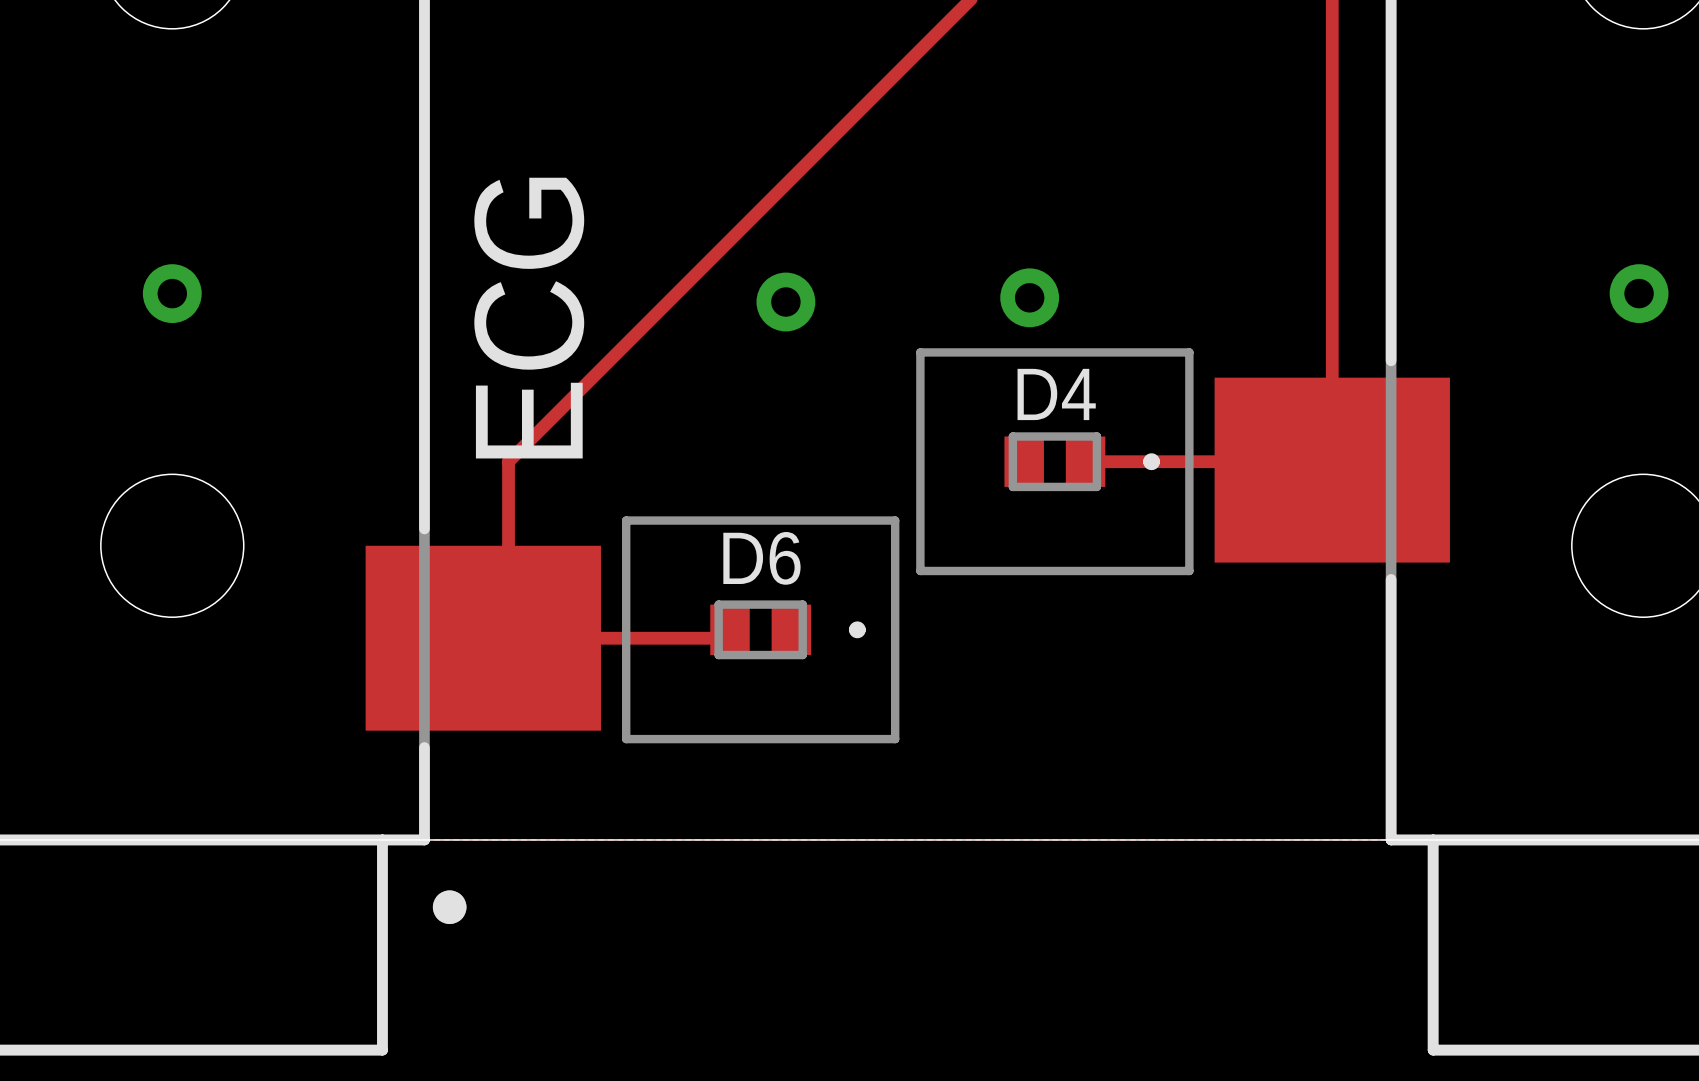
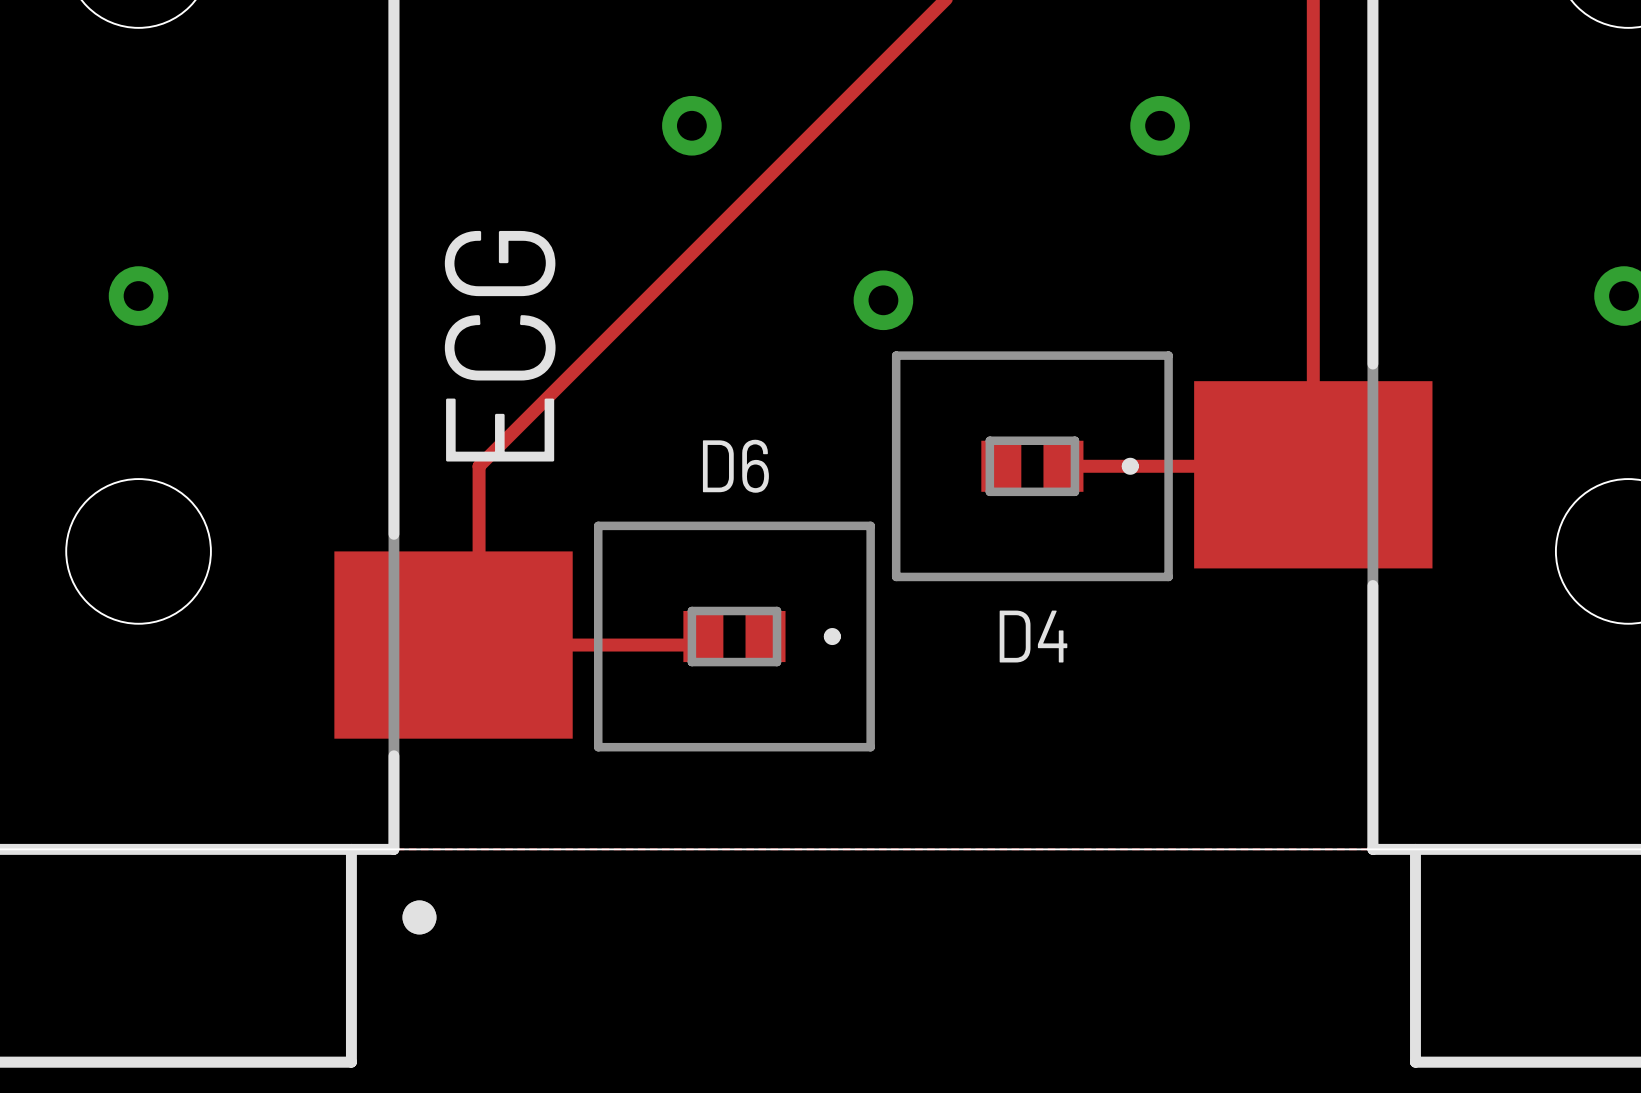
via: none -> (691, 125)
via: none -> (1160, 125)
via: none -> (883, 300)
via: (1029, 297) -> none
via: (785, 302) -> none
D4 name position: D4 (1056, 394) -> D4 (1033, 636)
D6 name position: D6 (761, 558) -> D6 (735, 466)

